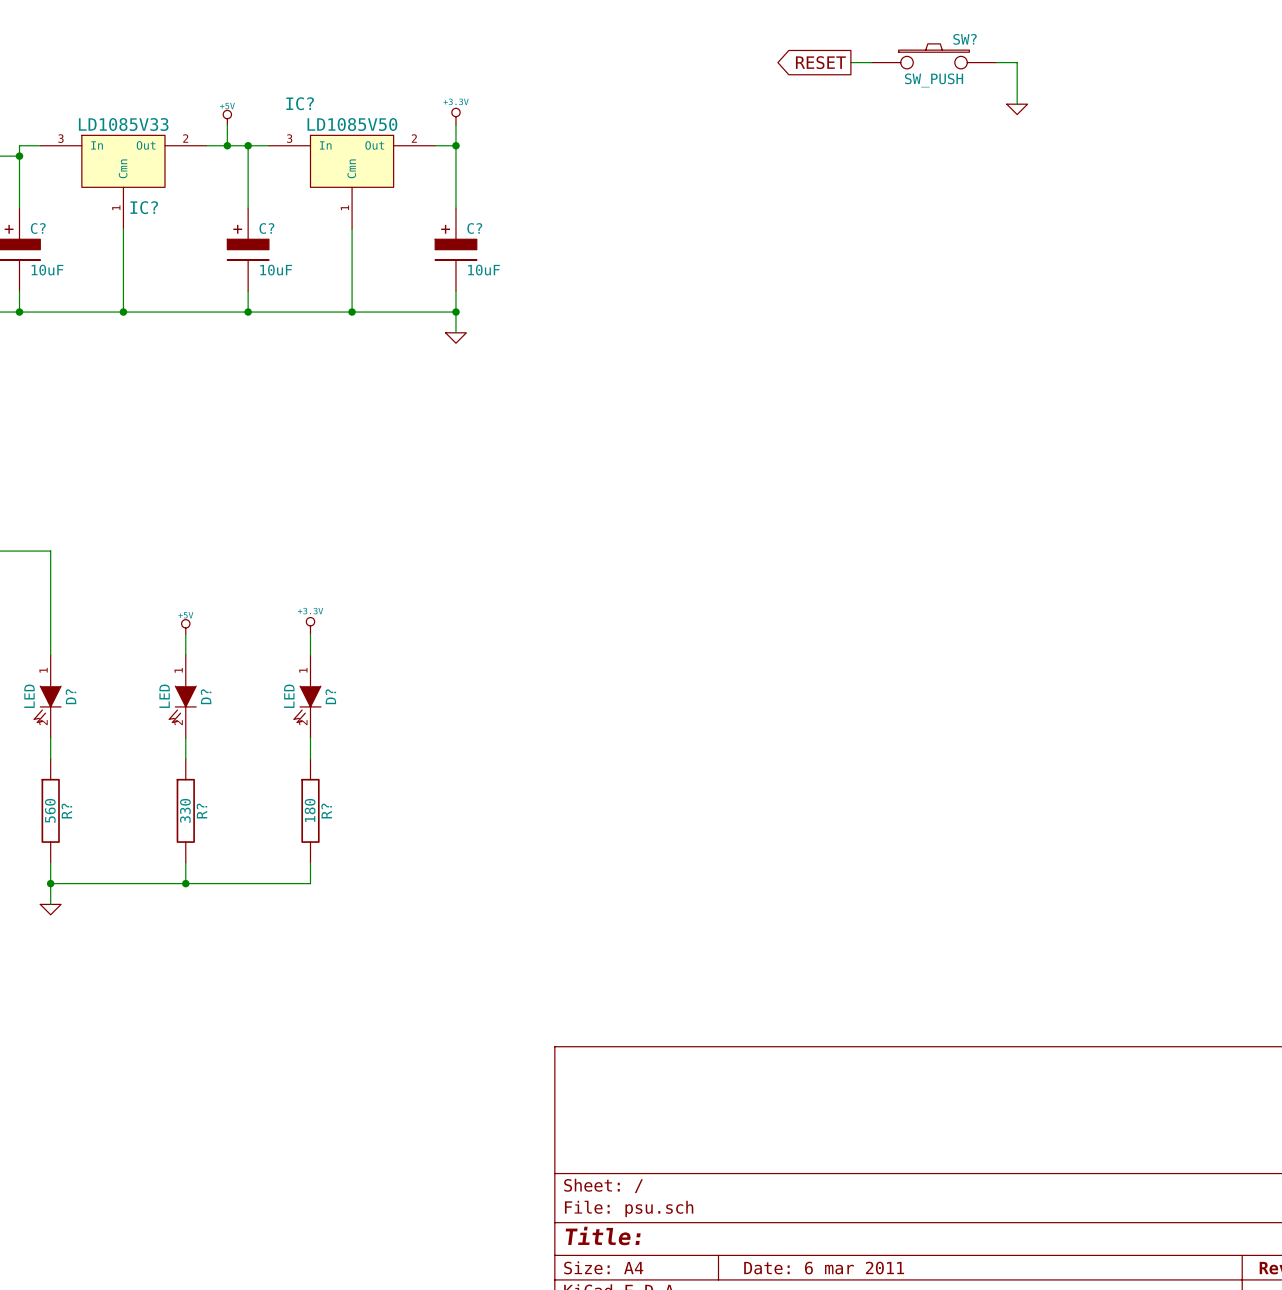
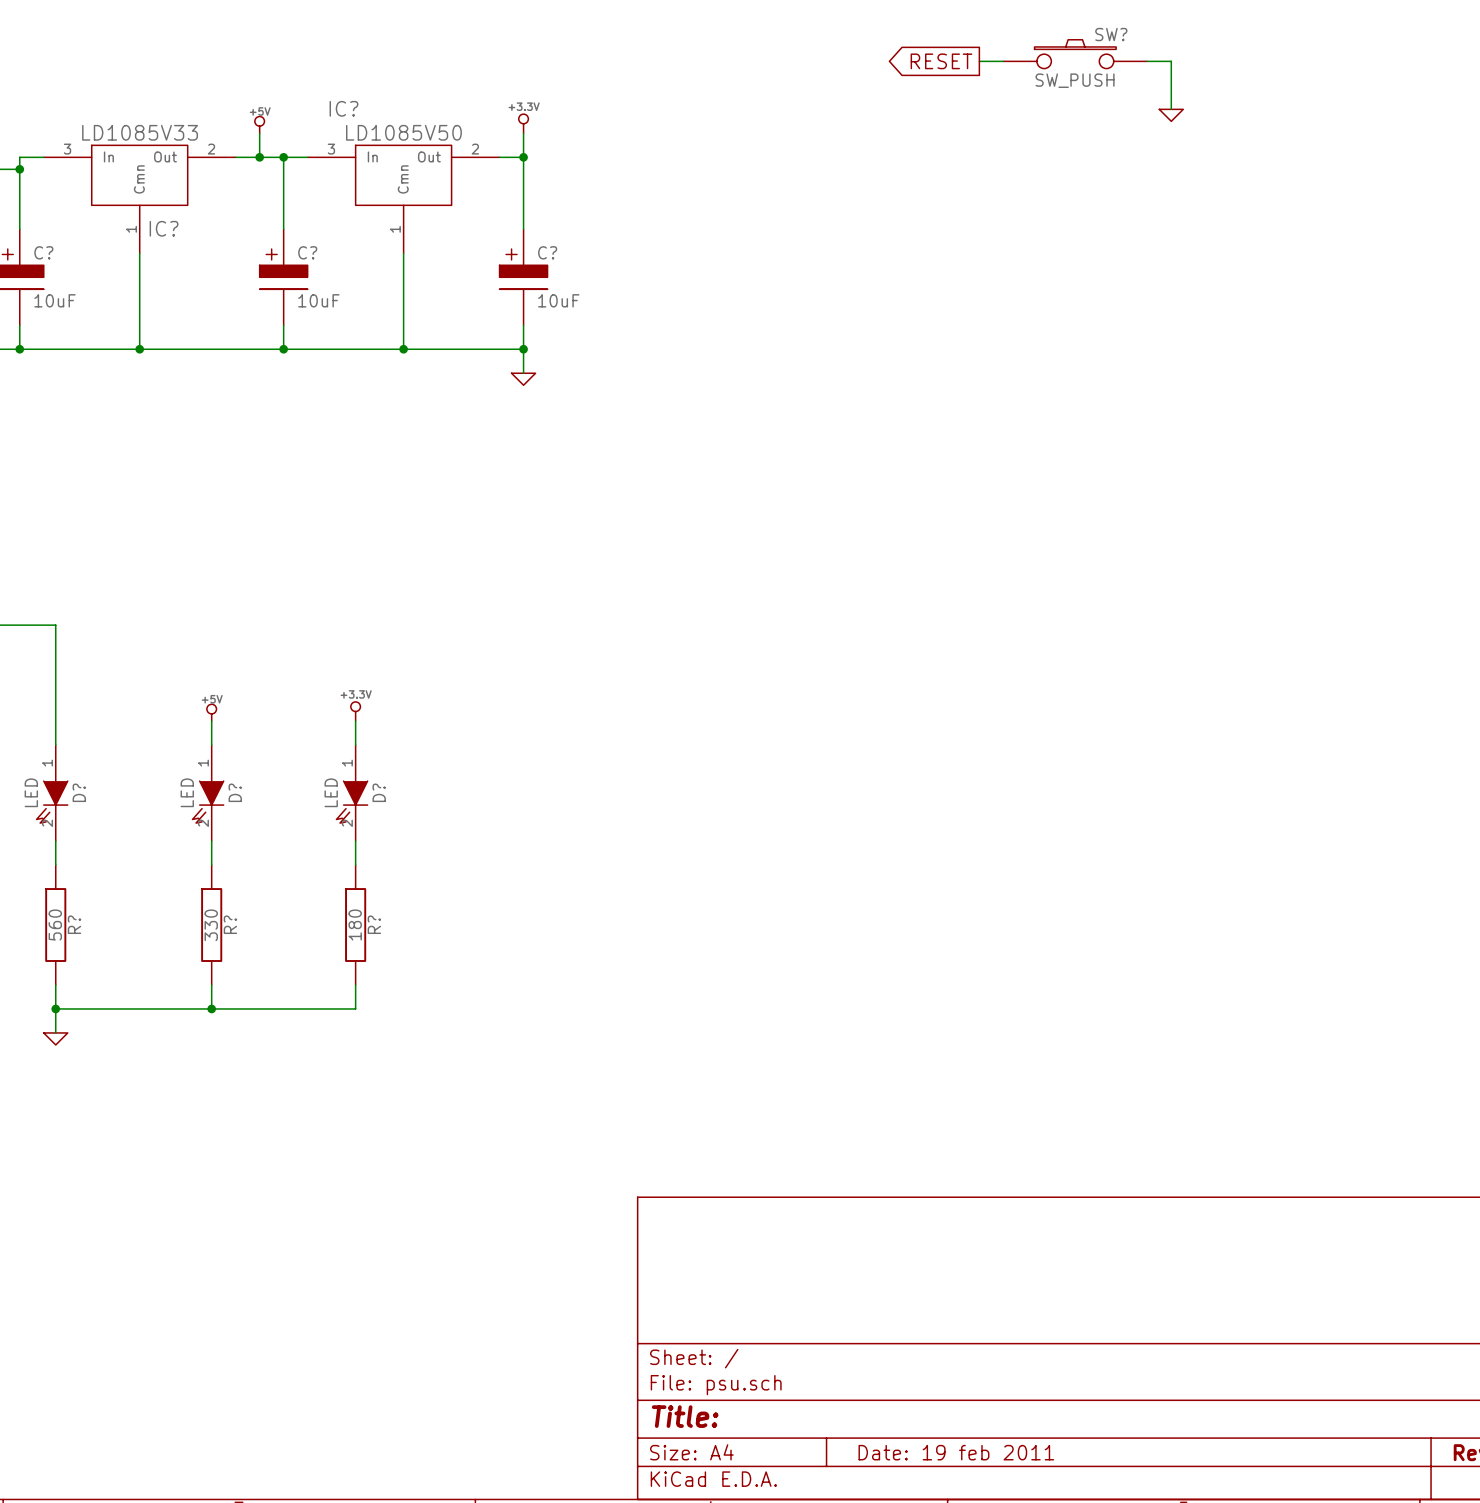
title block: Date: 6 mar 2011 (824, 1268) -> Date: 19 feb 2011 (956, 1452)

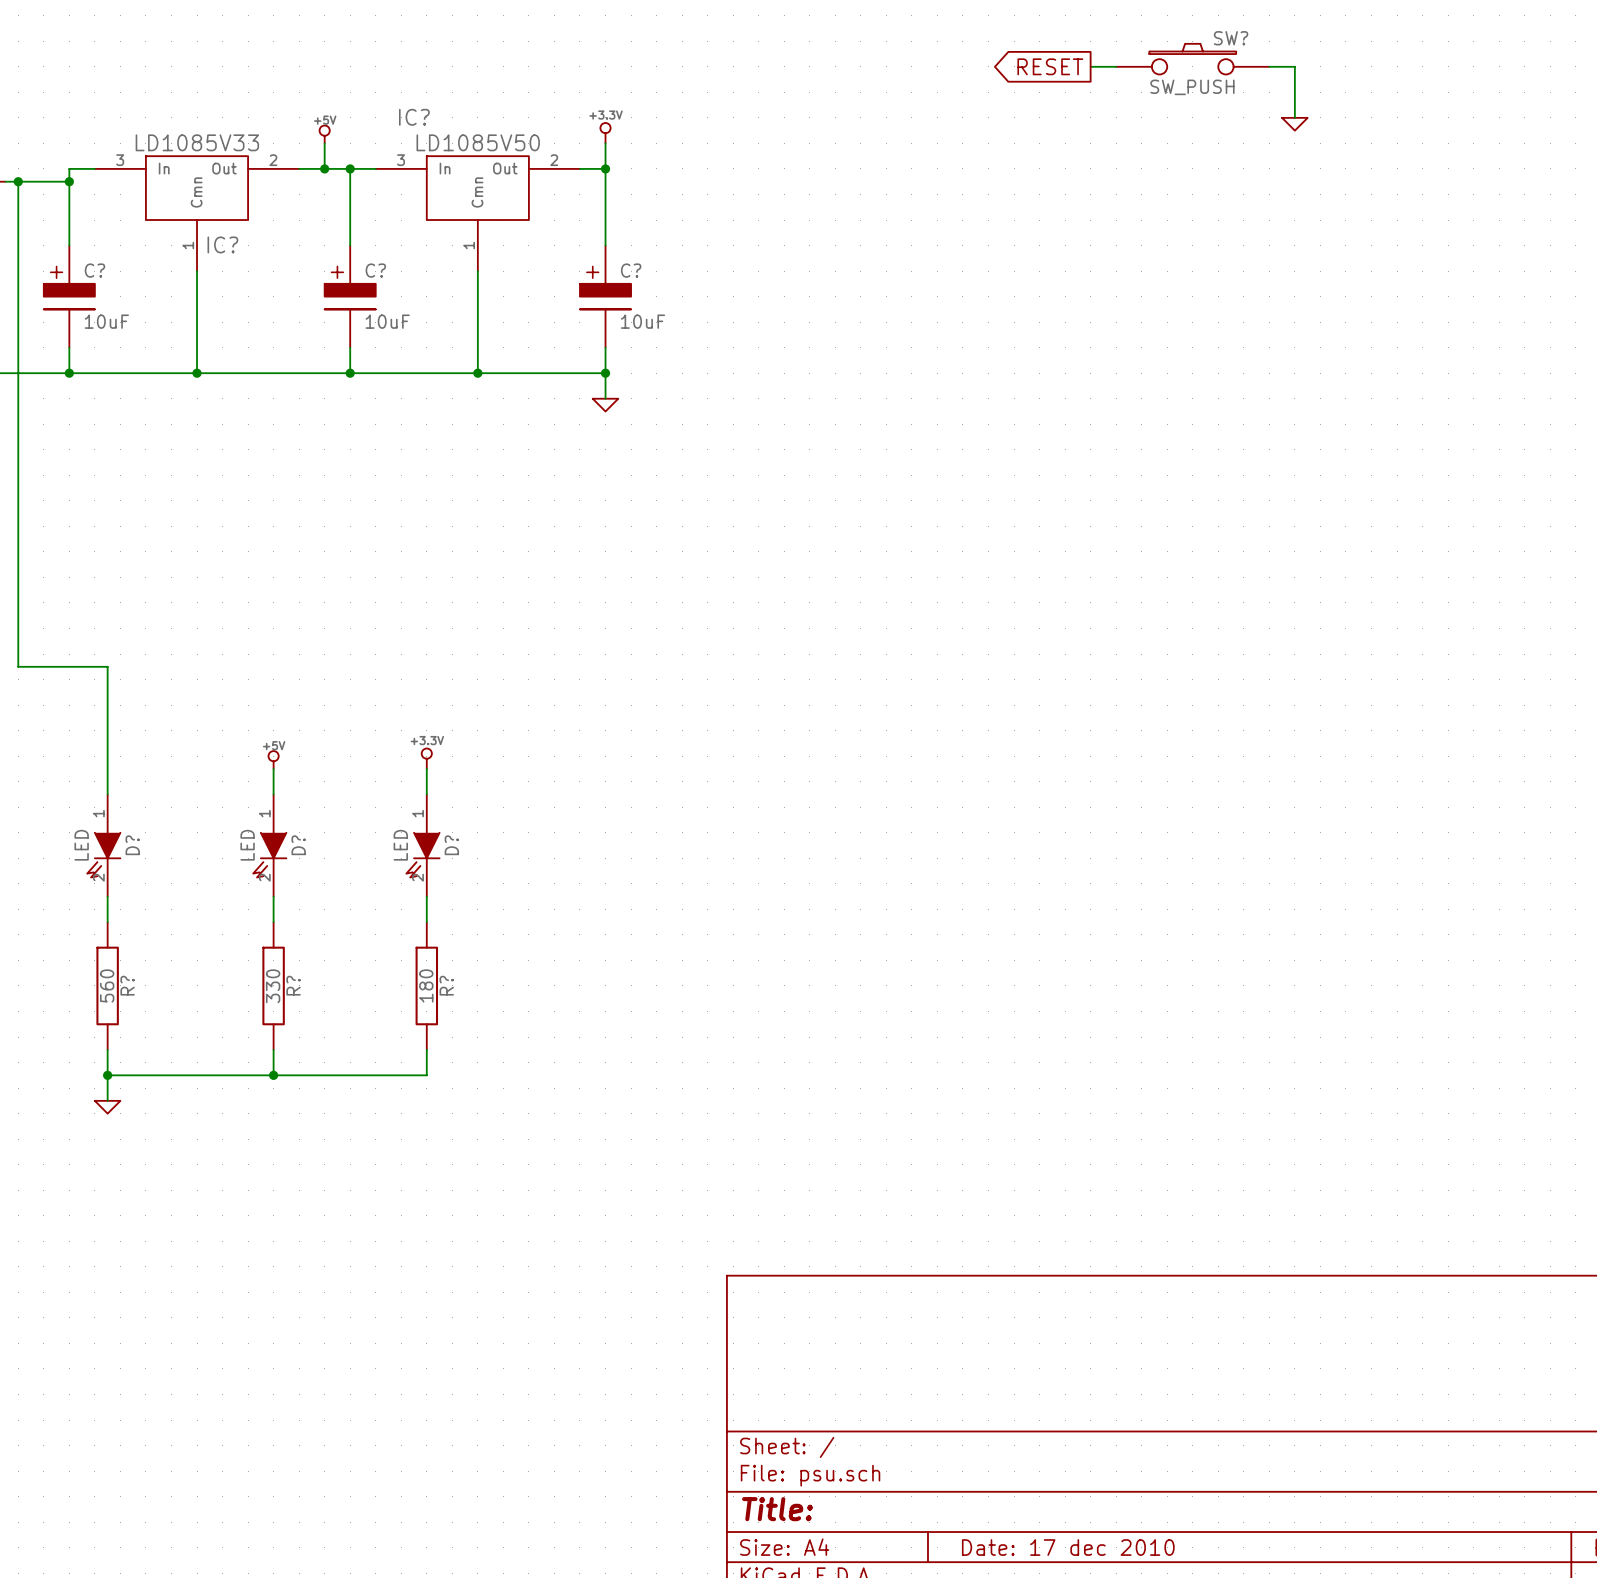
title block: Date: 19 feb 2011 (956, 1452) -> Date: 17 dec 2010 (1068, 1547)

